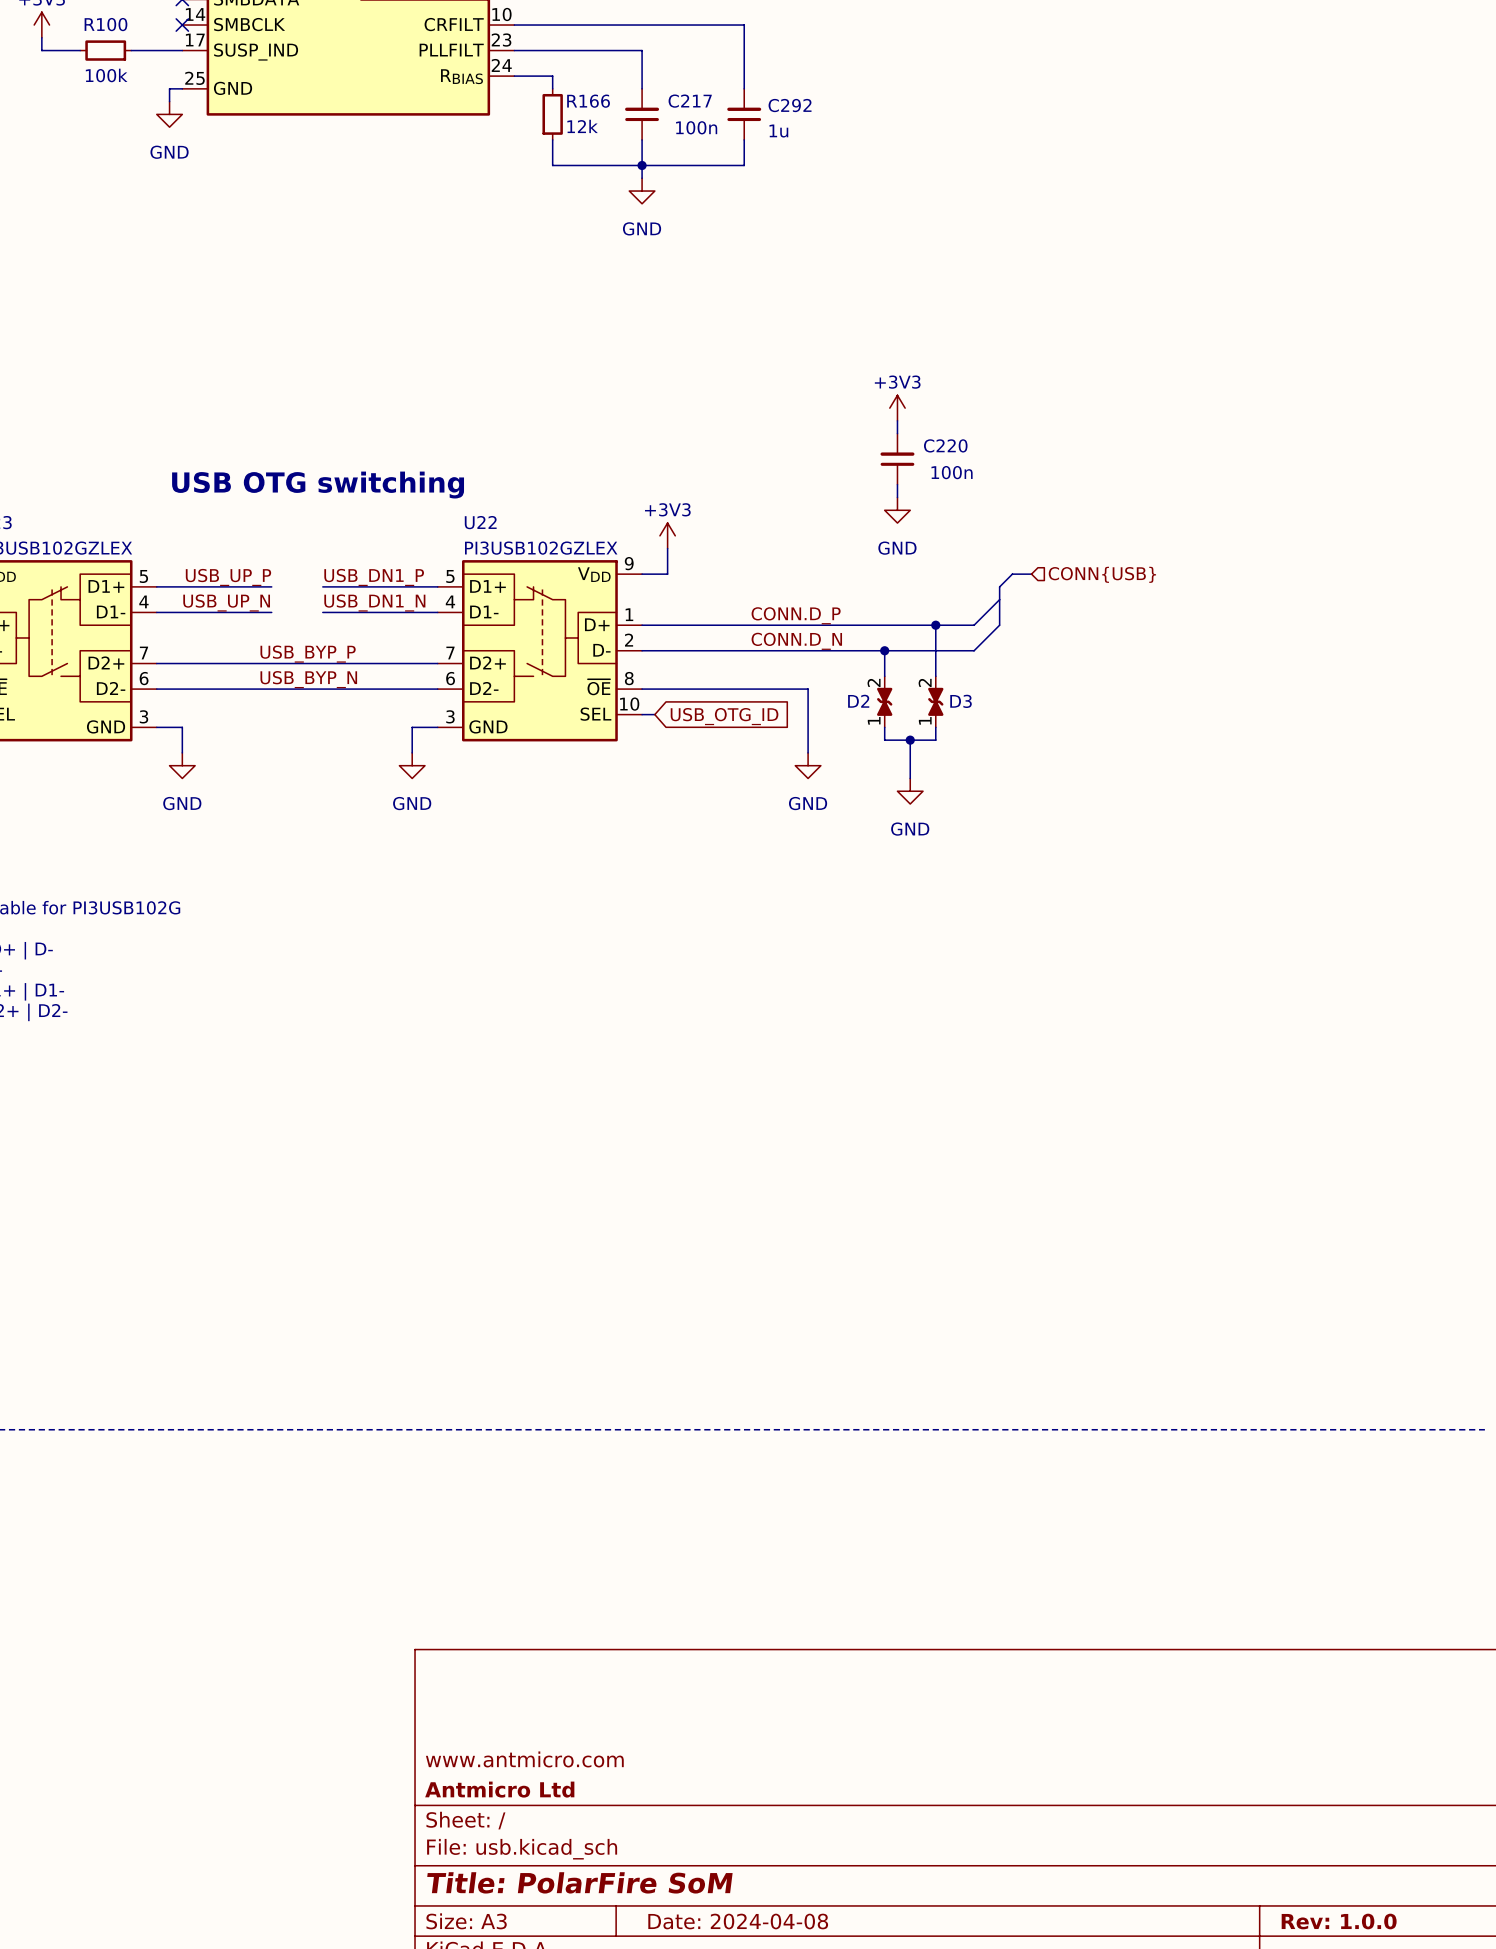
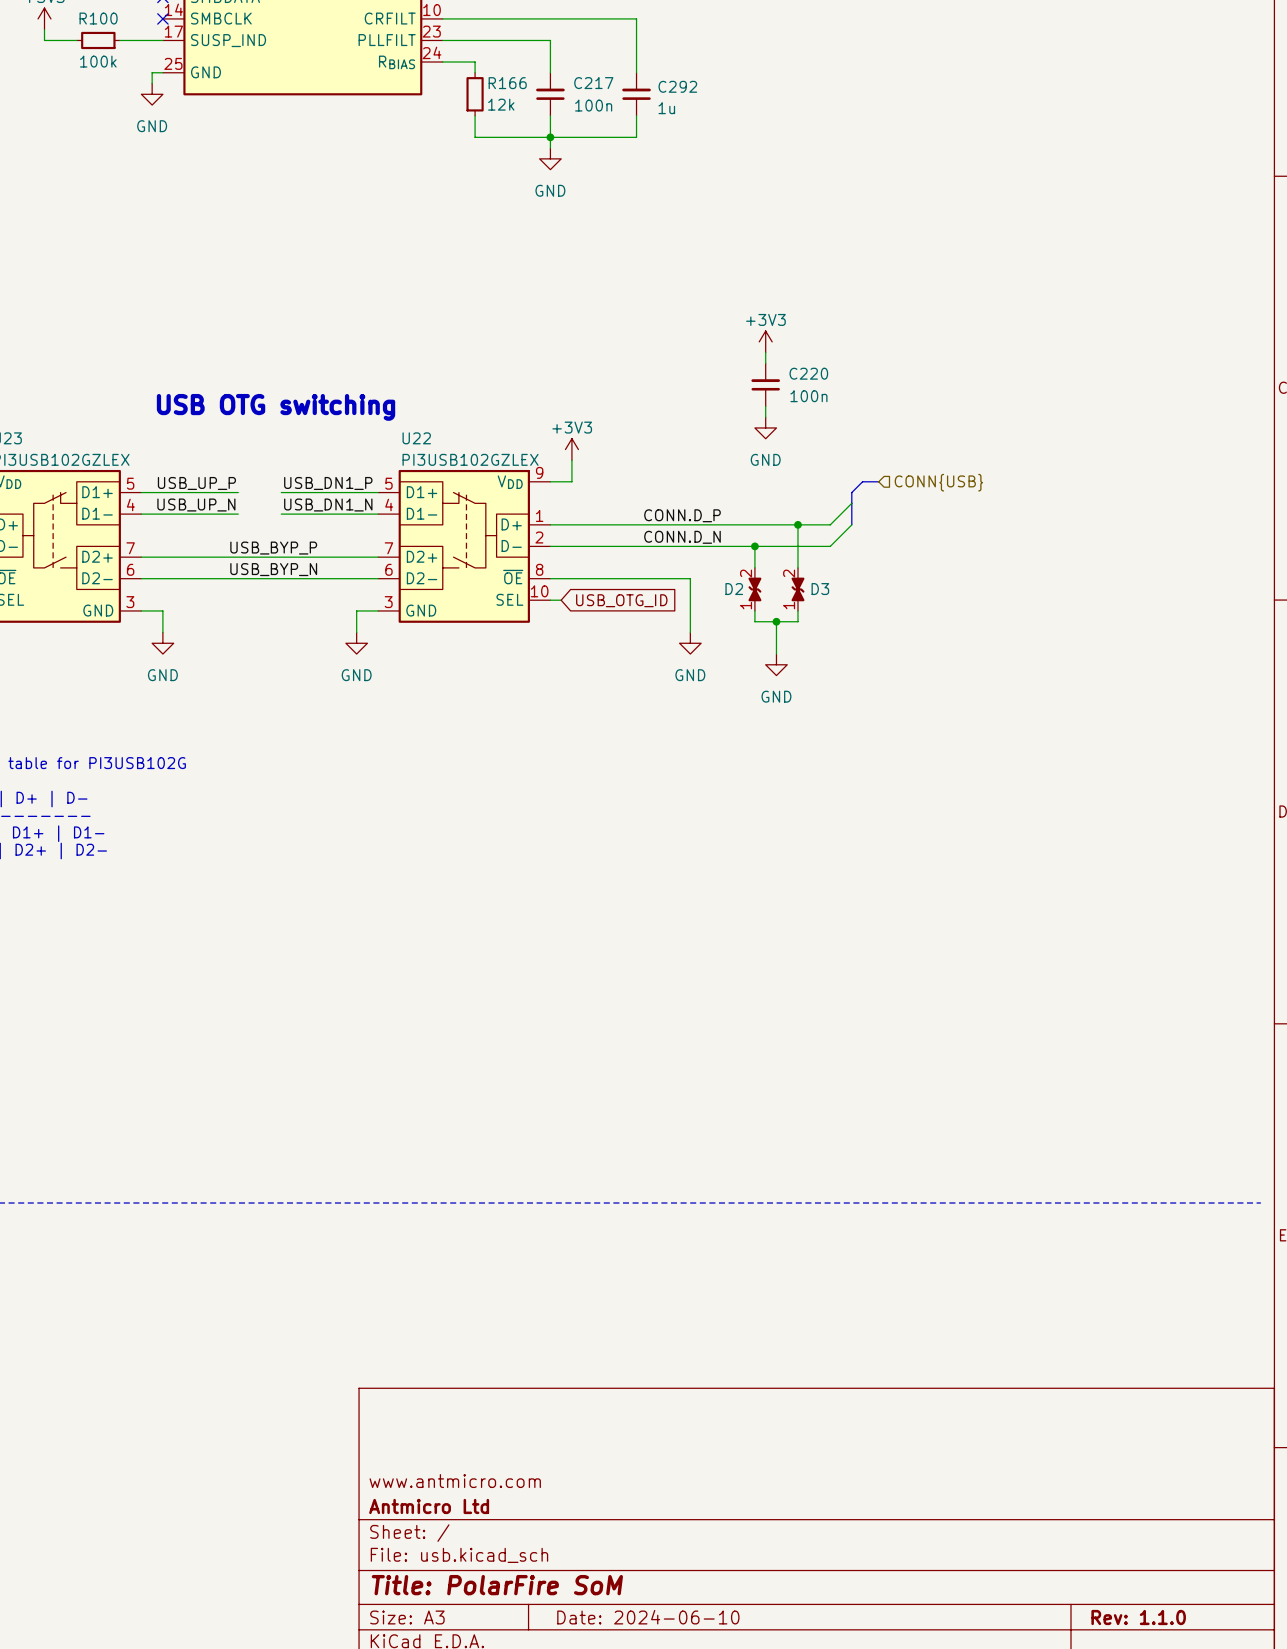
title block: Date: 2024-04-08 (738, 1921) -> Date: 2024-06-10 (648, 1617)
title block: Rev: 1.0.0 (1339, 1921) -> Rev: 1.1.0 (1138, 1617)

